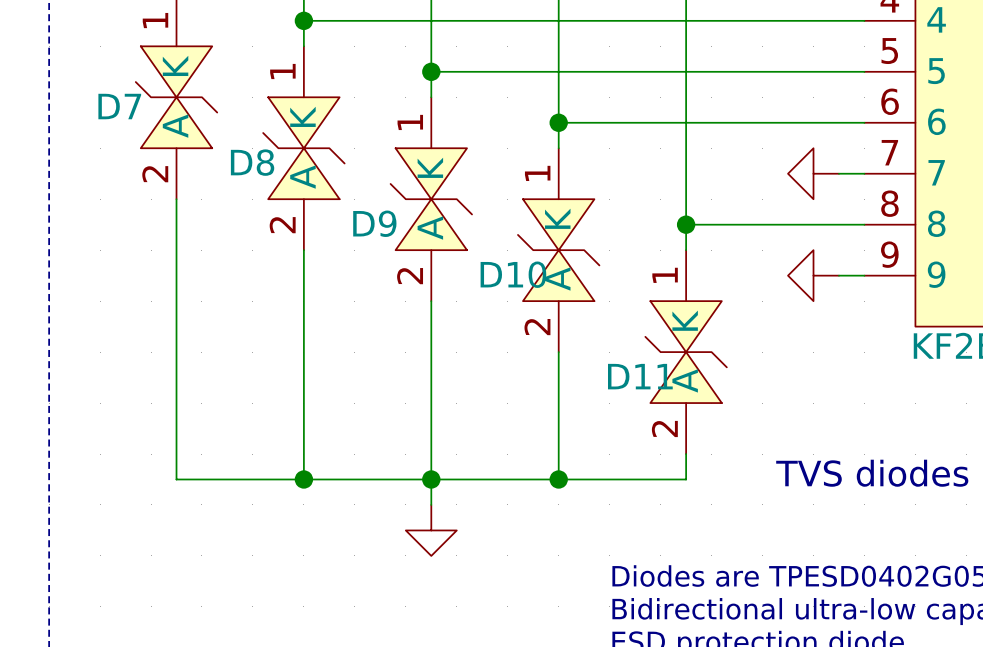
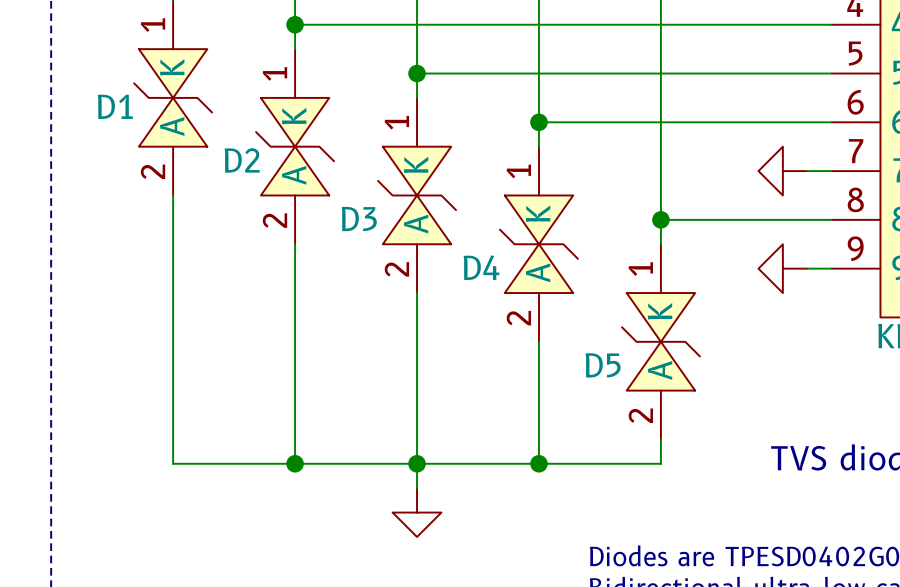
D7 name: D7 (119, 106) -> D1 (115, 106)
D8 name: D8 (252, 162) -> D2 (242, 160)
D9 name: D9 (374, 223) -> D3 (359, 219)
D10 name: D10 (513, 274) -> D4 (481, 267)
D11 name: D11 (640, 376) -> D5 (603, 365)

